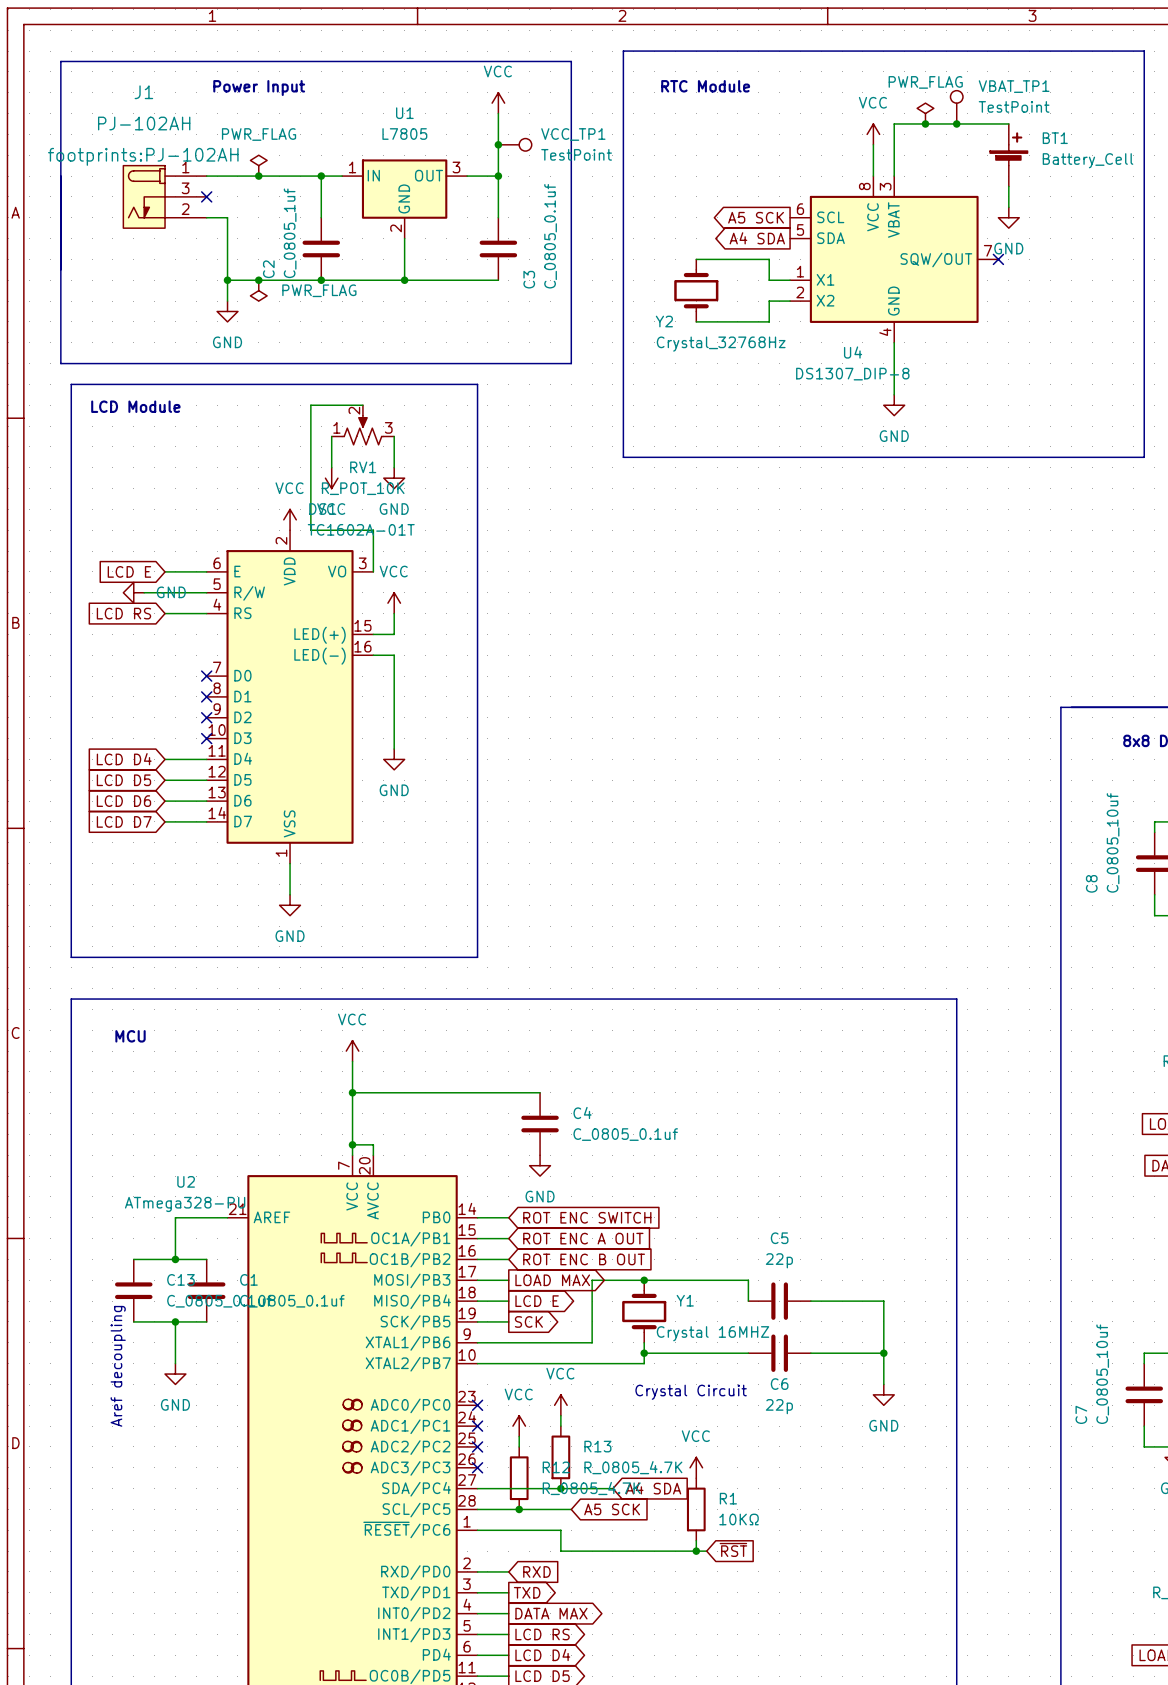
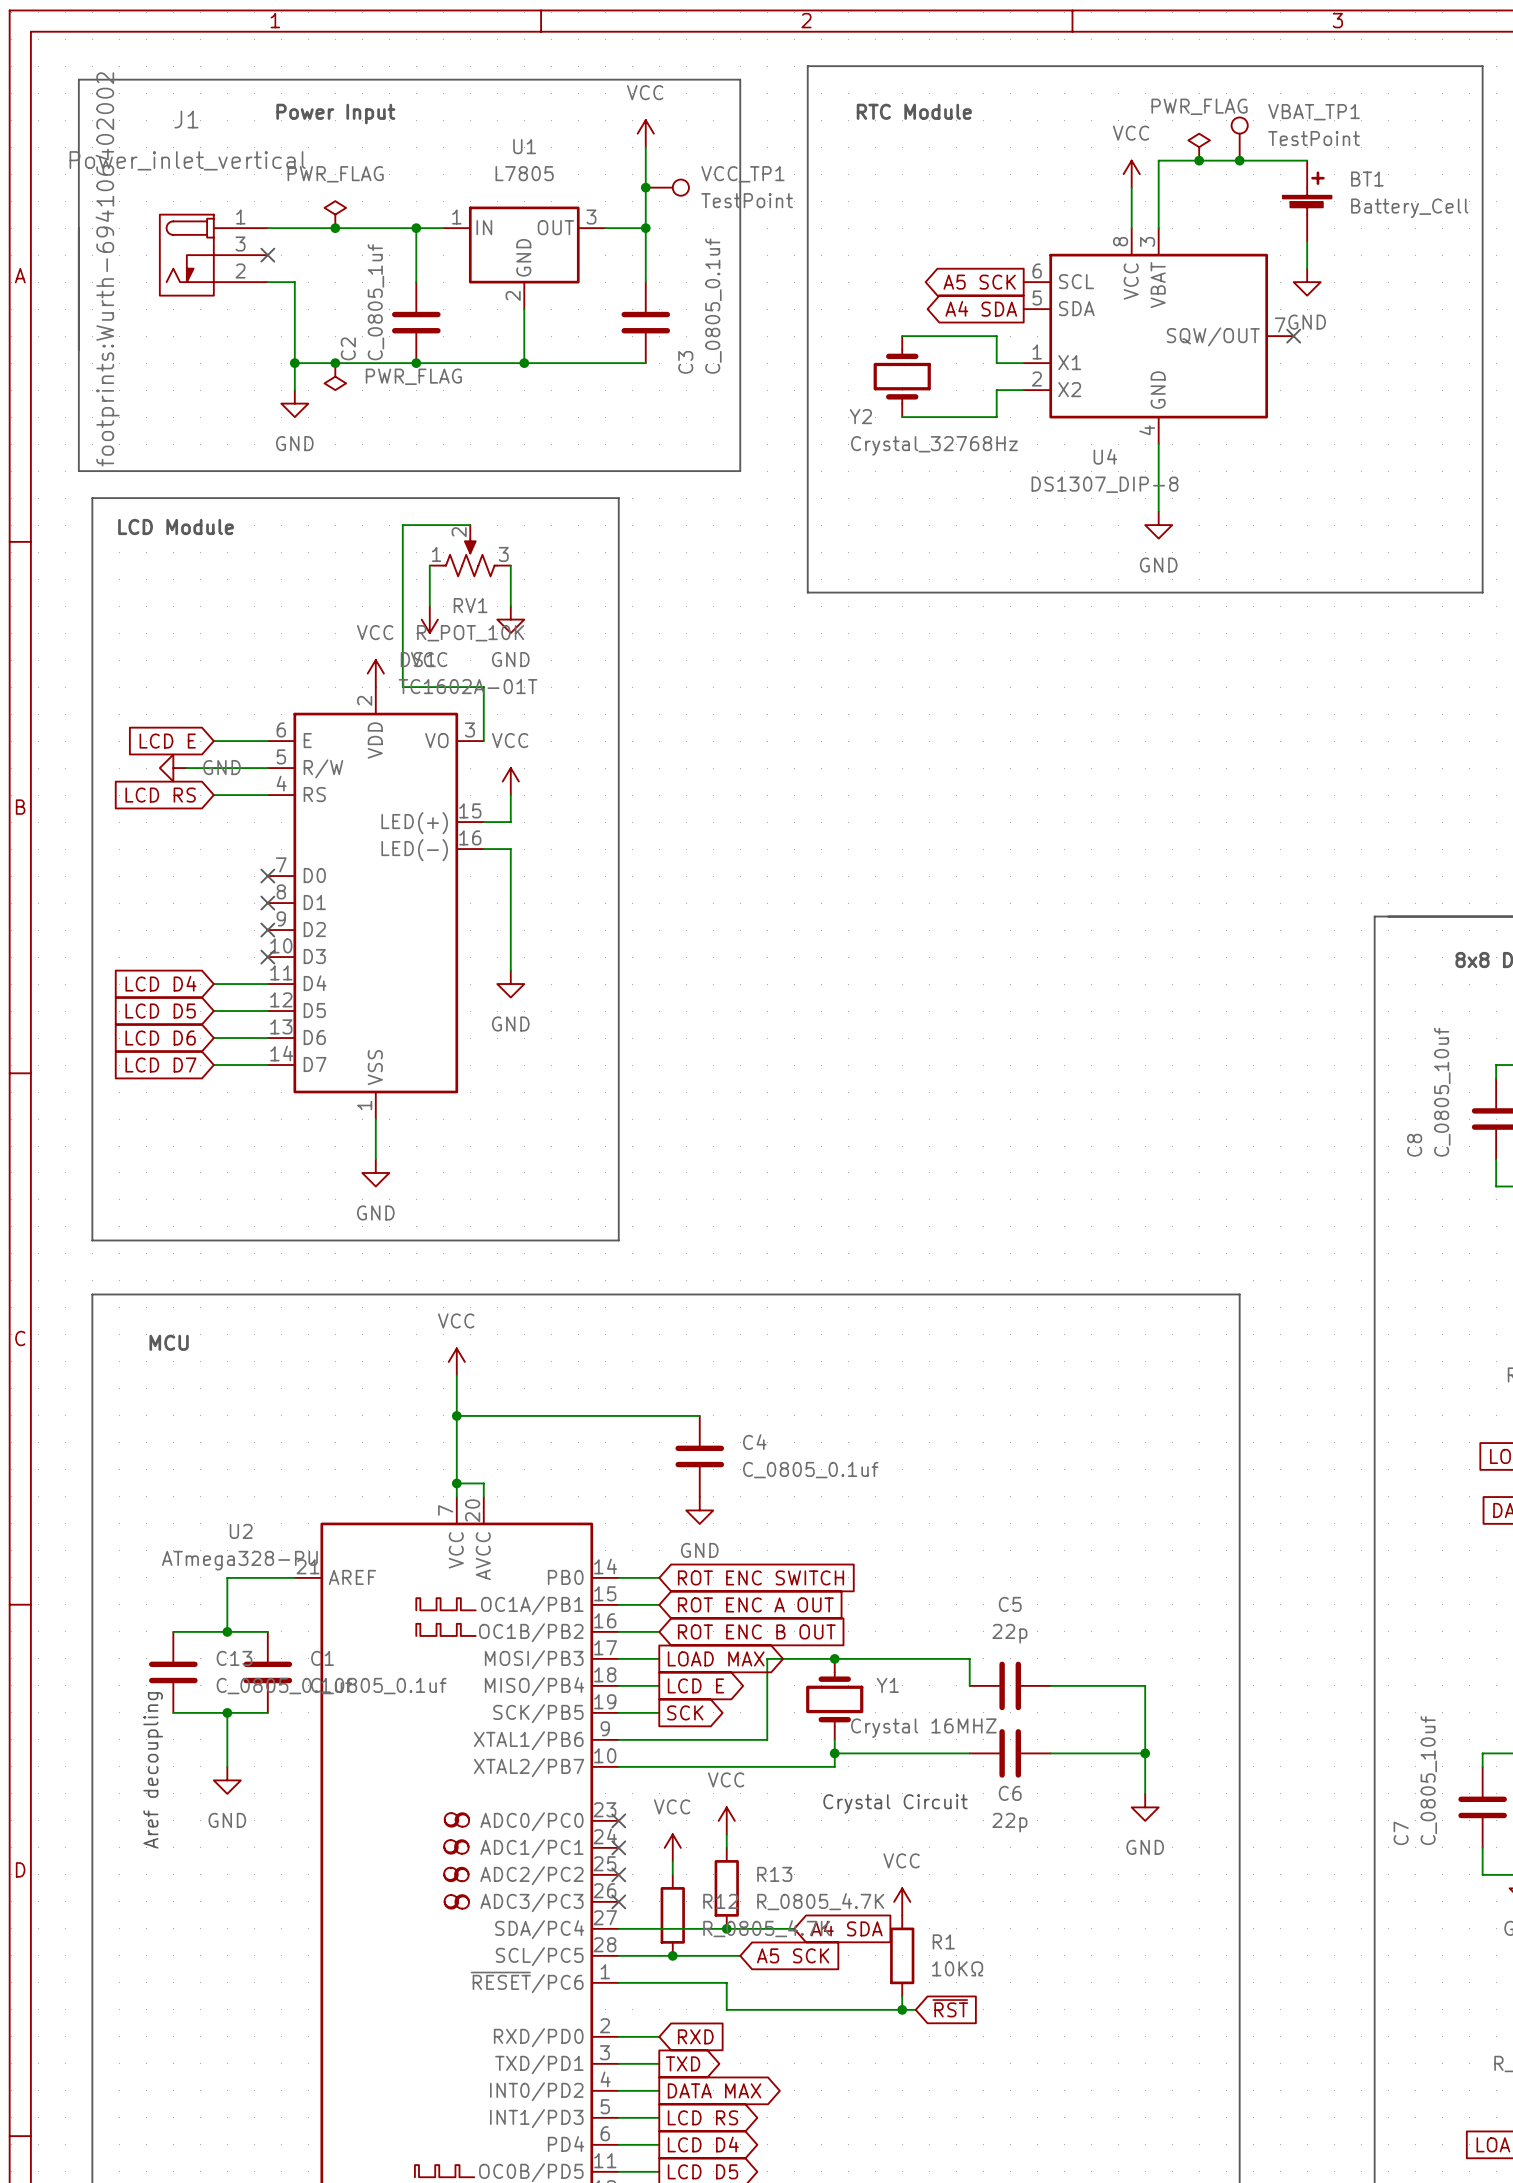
J1 value: PJ-102AH (144, 123) -> Power_inlet_vertical (187, 160)
J1 text: footprints:PJ-102AH (143, 156) -> footprints:Wurth-694106402002 (107, 269)

